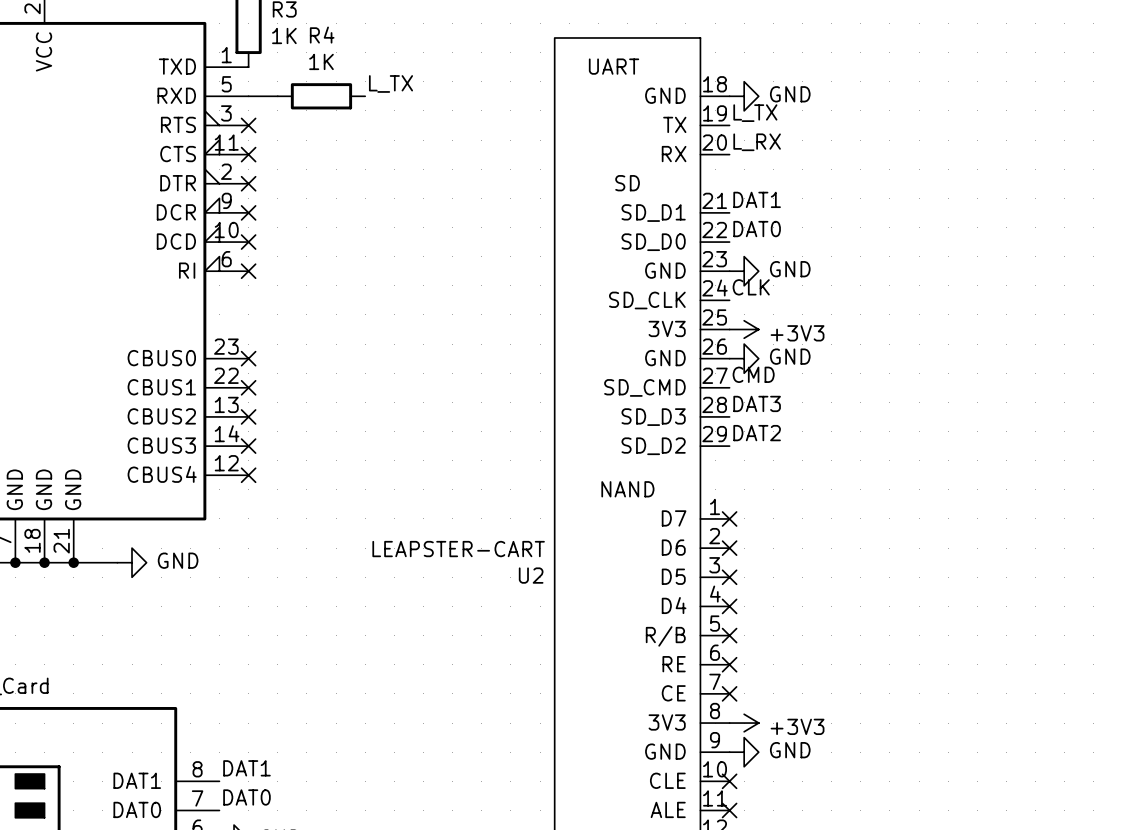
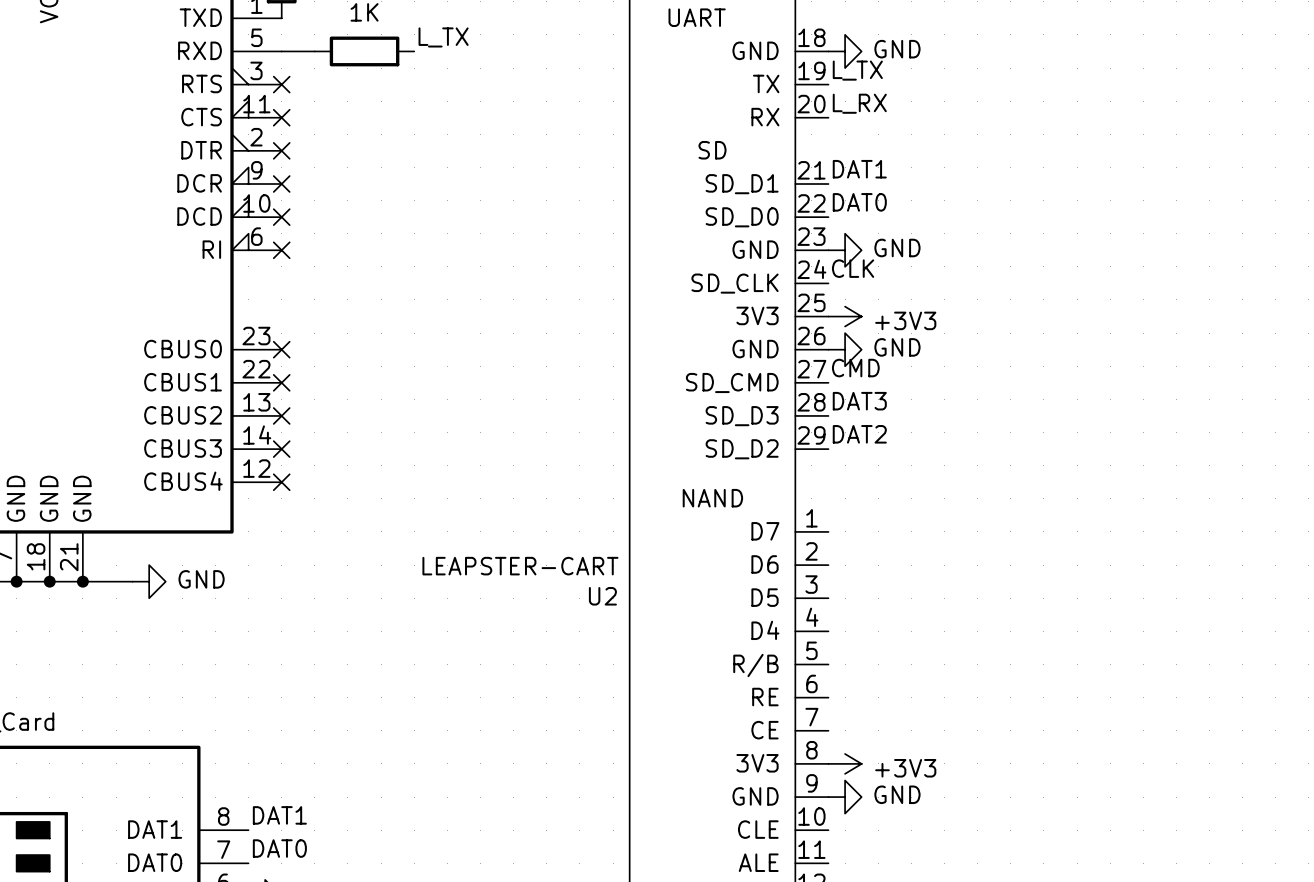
no-connect mark: (729, 518) -> none
no-connect mark: (729, 548) -> none
no-connect mark: (729, 577) -> none
no-connect mark: (729, 606) -> none
no-connect mark: (729, 635) -> none
no-connect mark: (729, 664) -> none
no-connect mark: (729, 693) -> none
no-connect mark: (729, 781) -> none
no-connect mark: (729, 810) -> none

